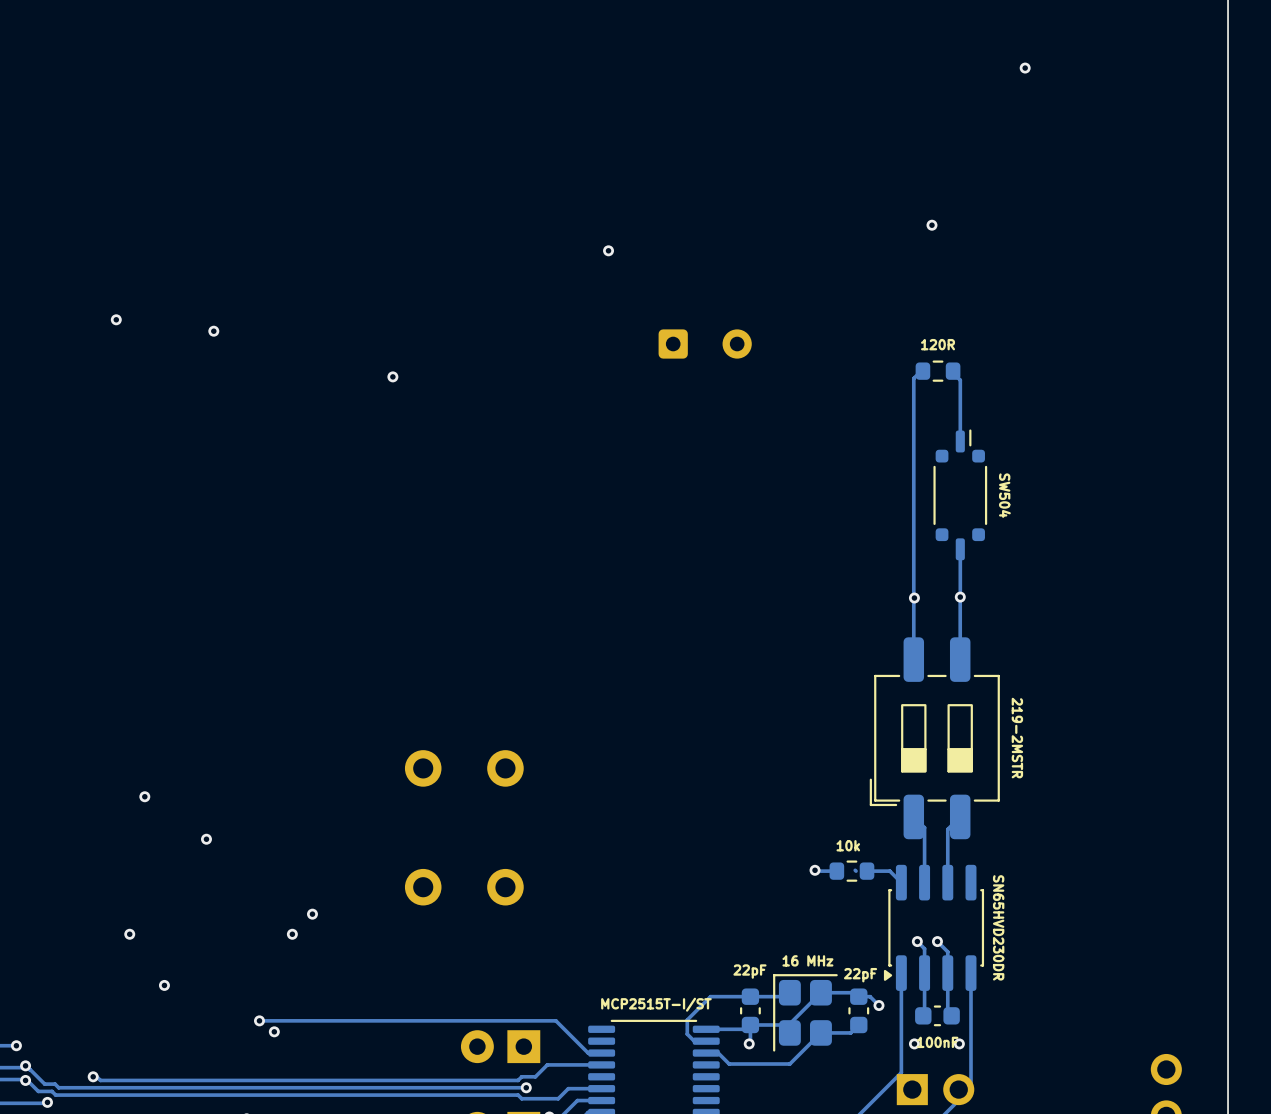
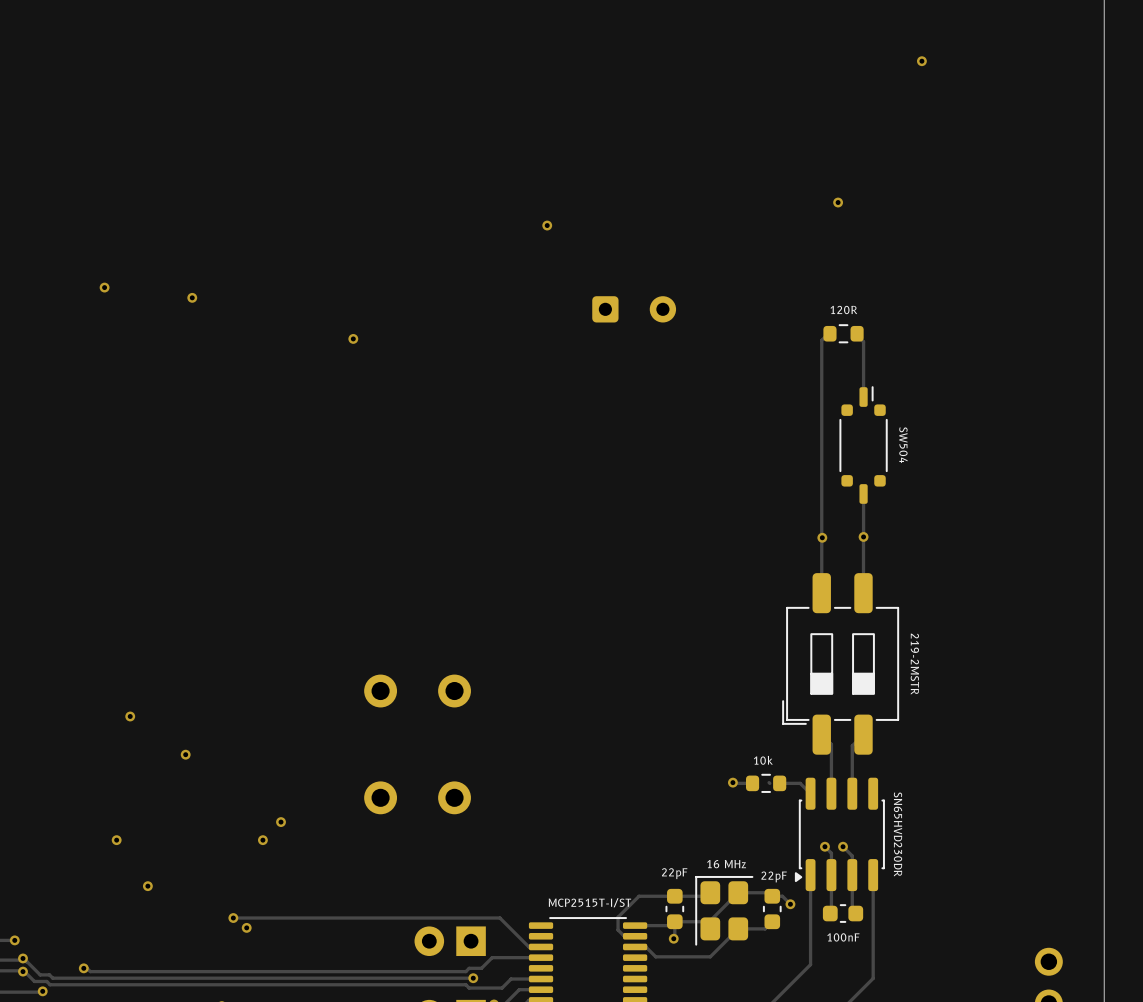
via: (914, 1043) -> none
via: (959, 1043) -> none
part: (935, 1089) -> none

